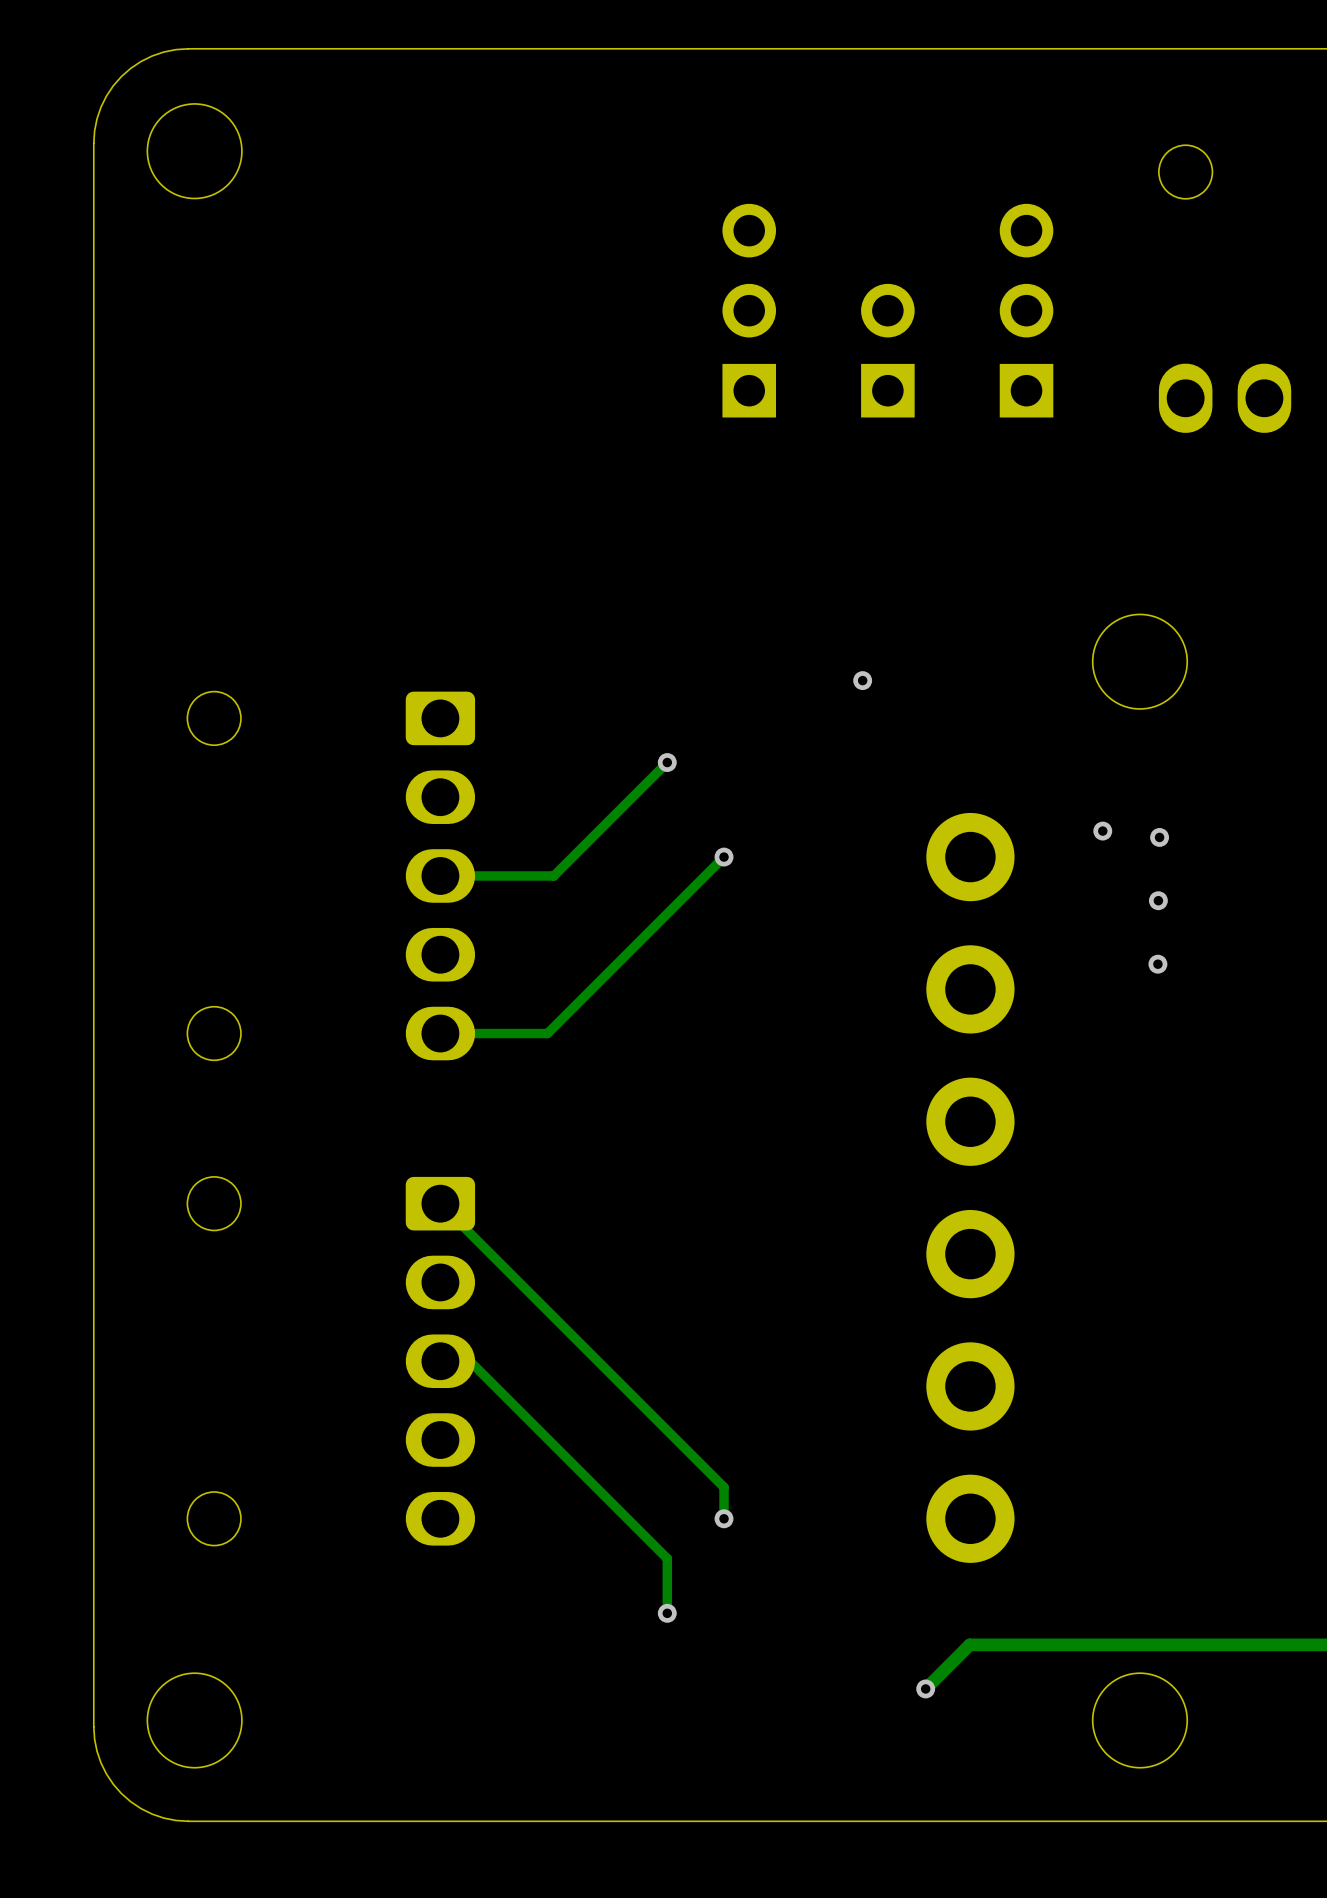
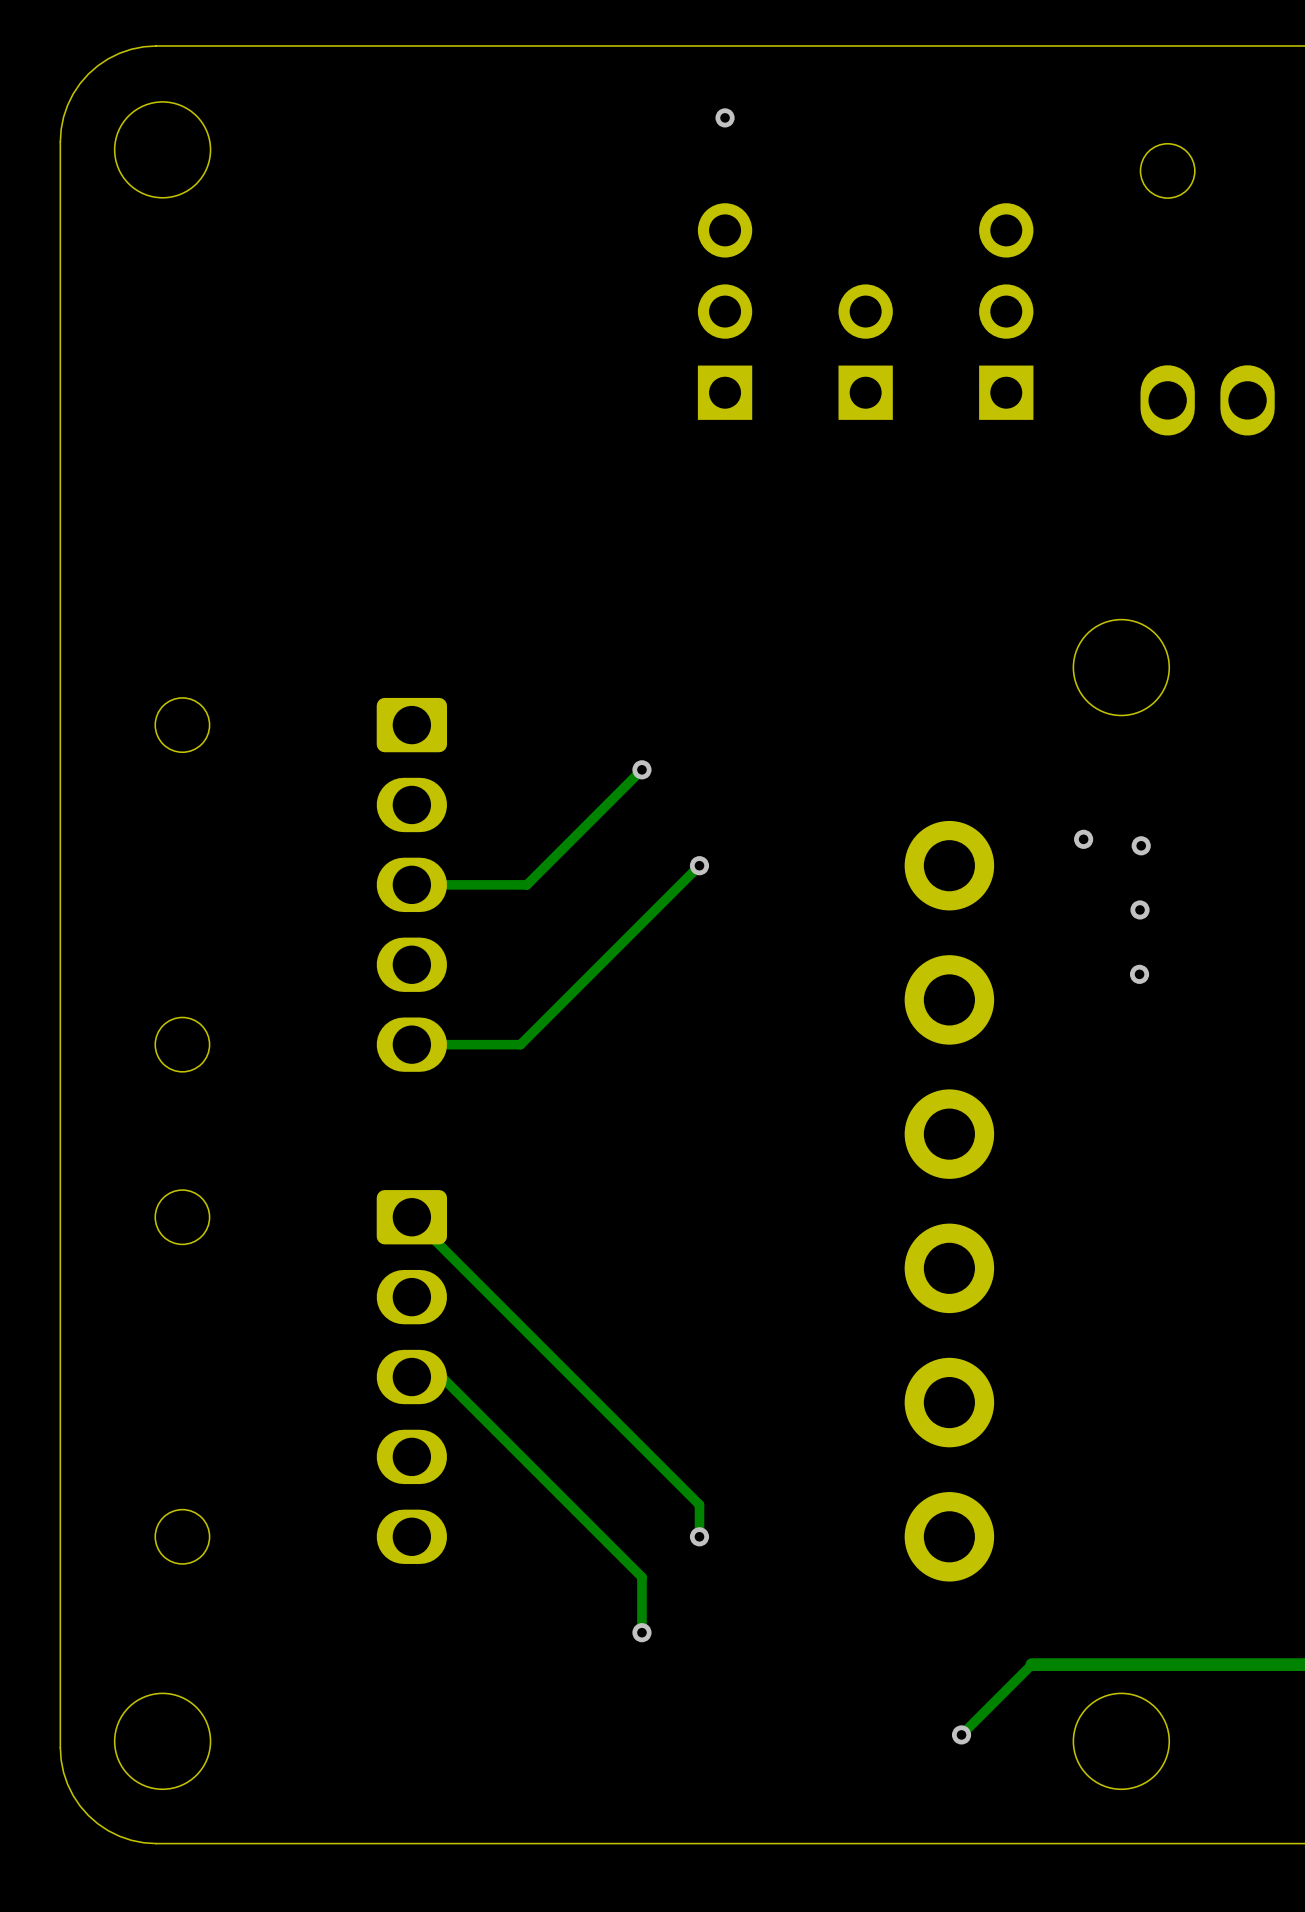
via: none -> (725, 117)
via: (862, 680) -> none
track: (1051, 1644) (969, 1644) (925, 1688) -> (1031, 1664) (961, 1734)
via position: (925, 1688) -> (961, 1734)

